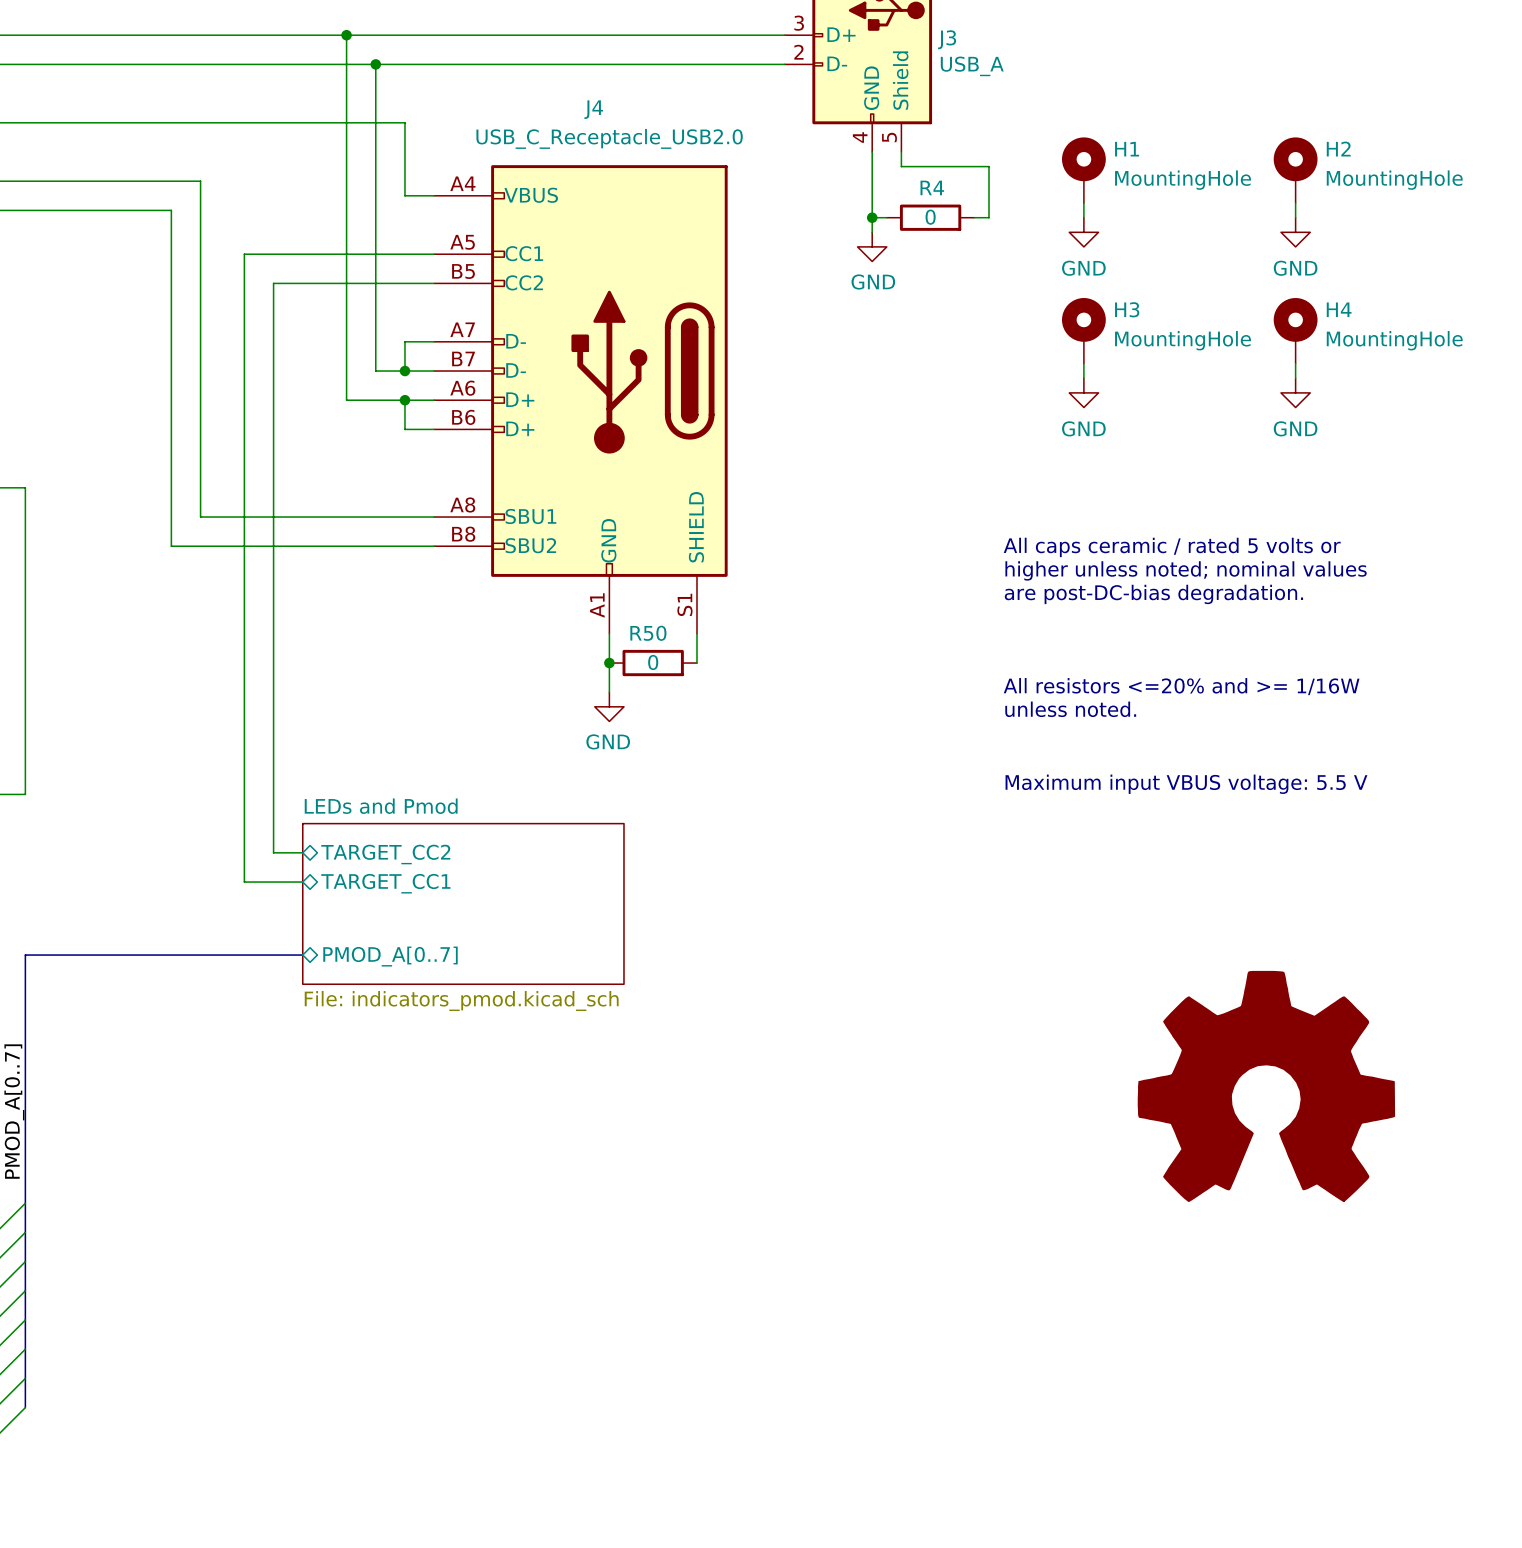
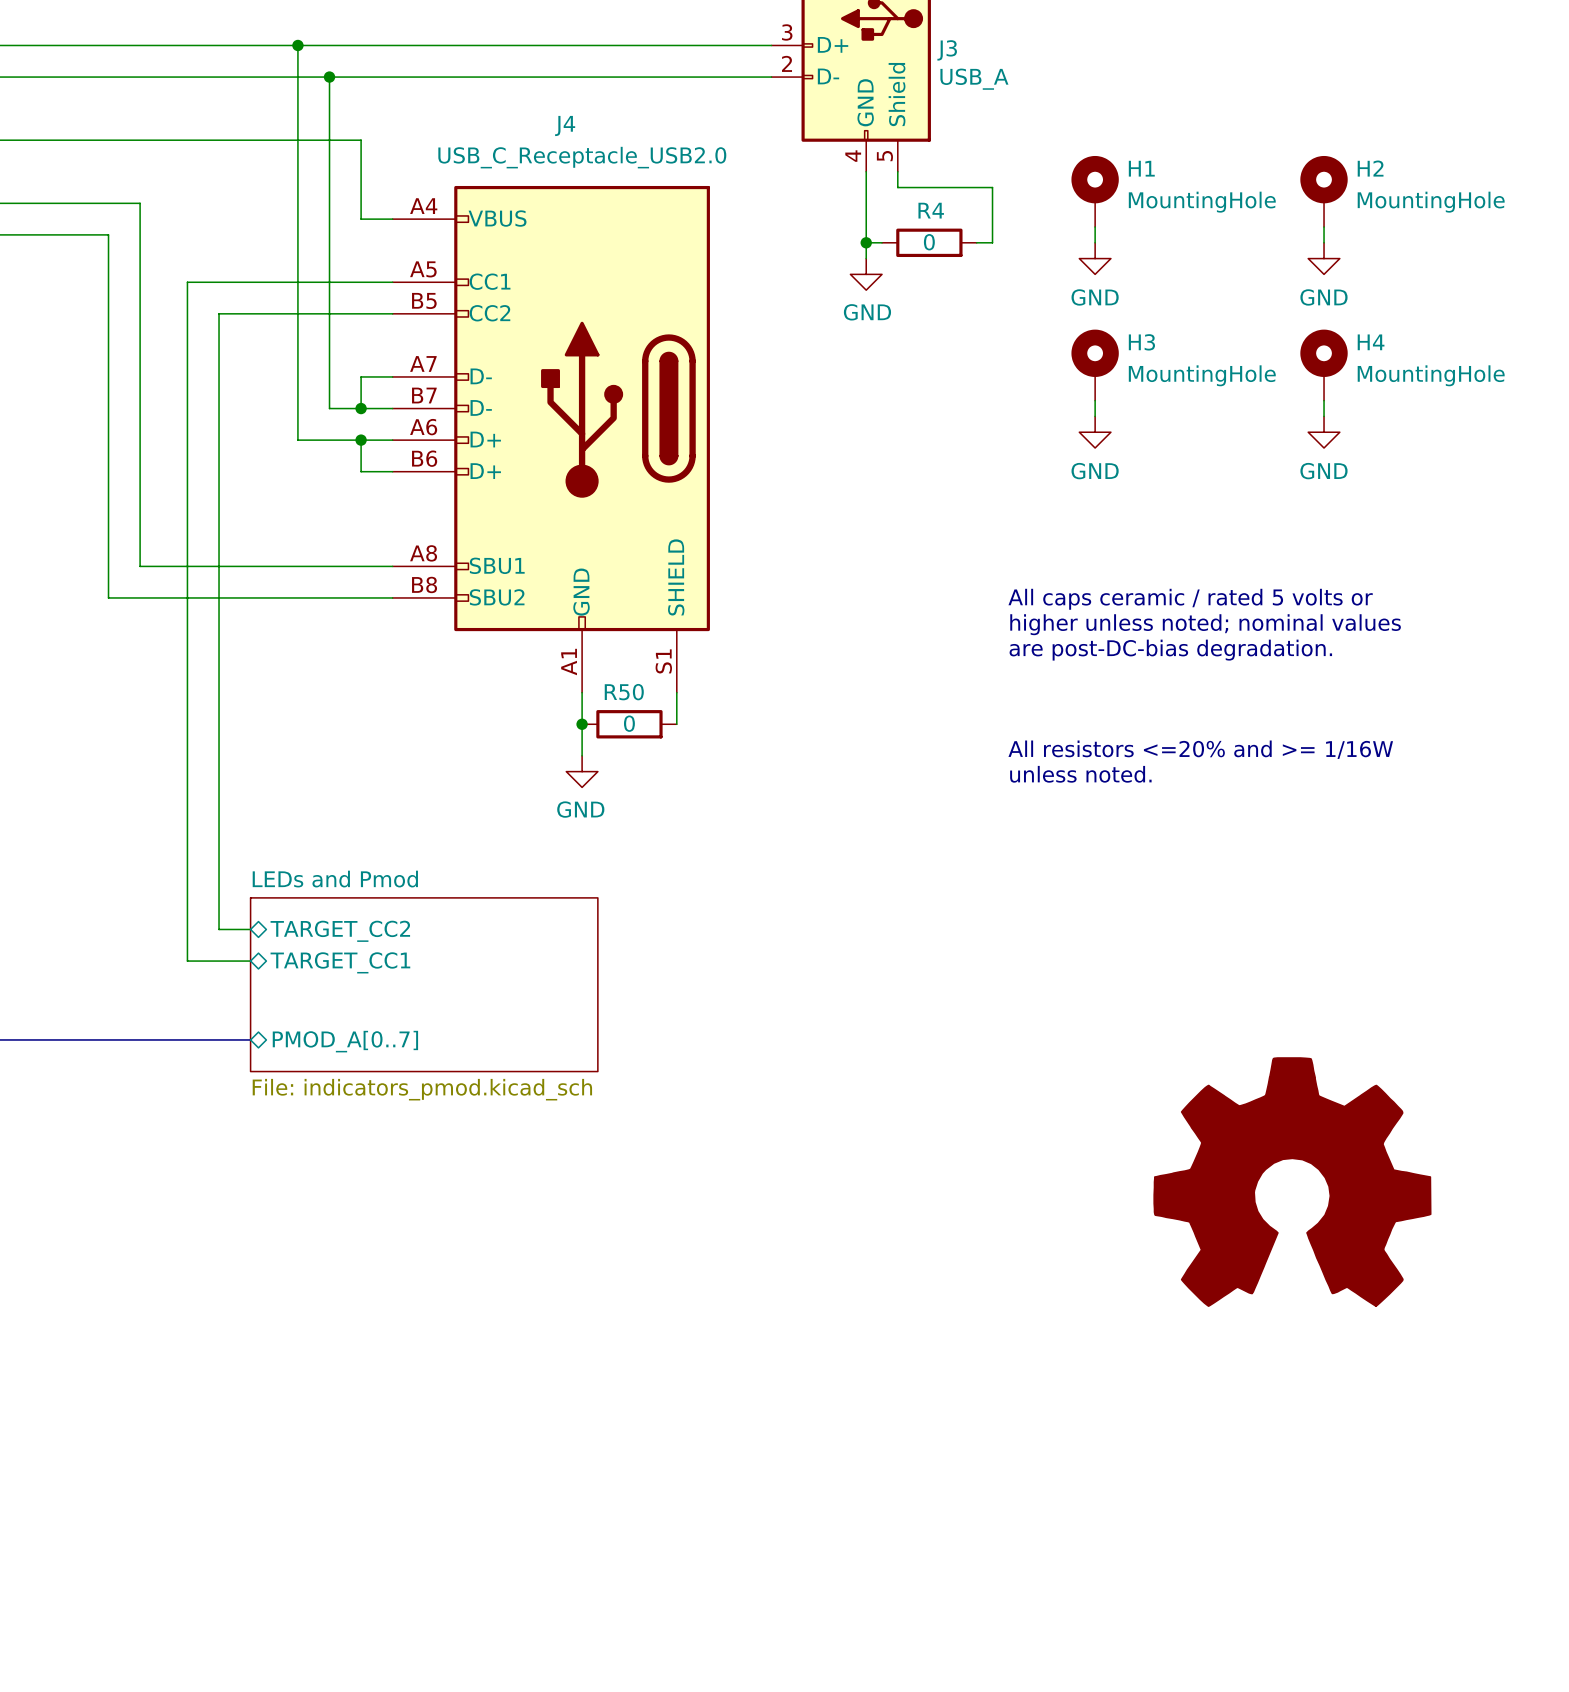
text: Maximum input VBUS voltage: 5.5 V (1186, 784) -> none

